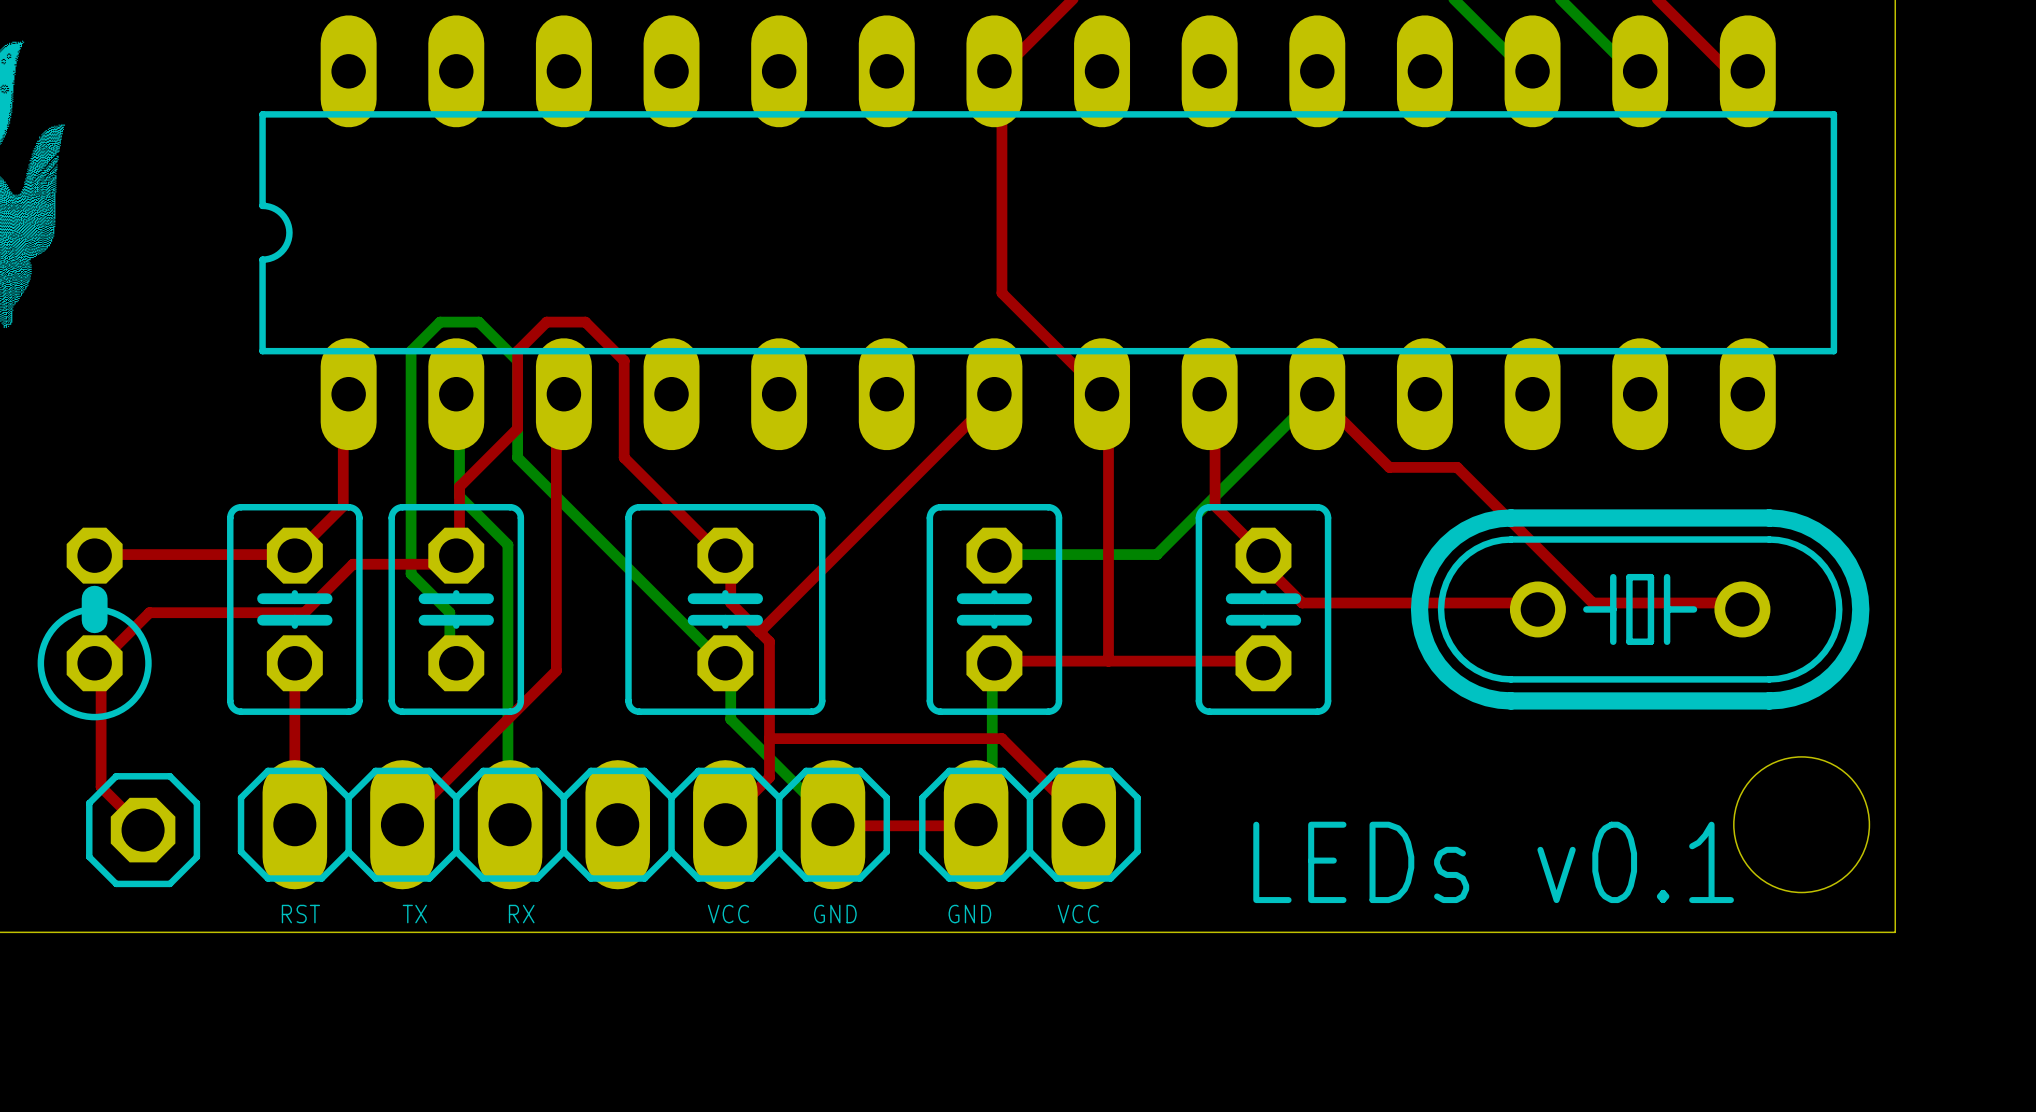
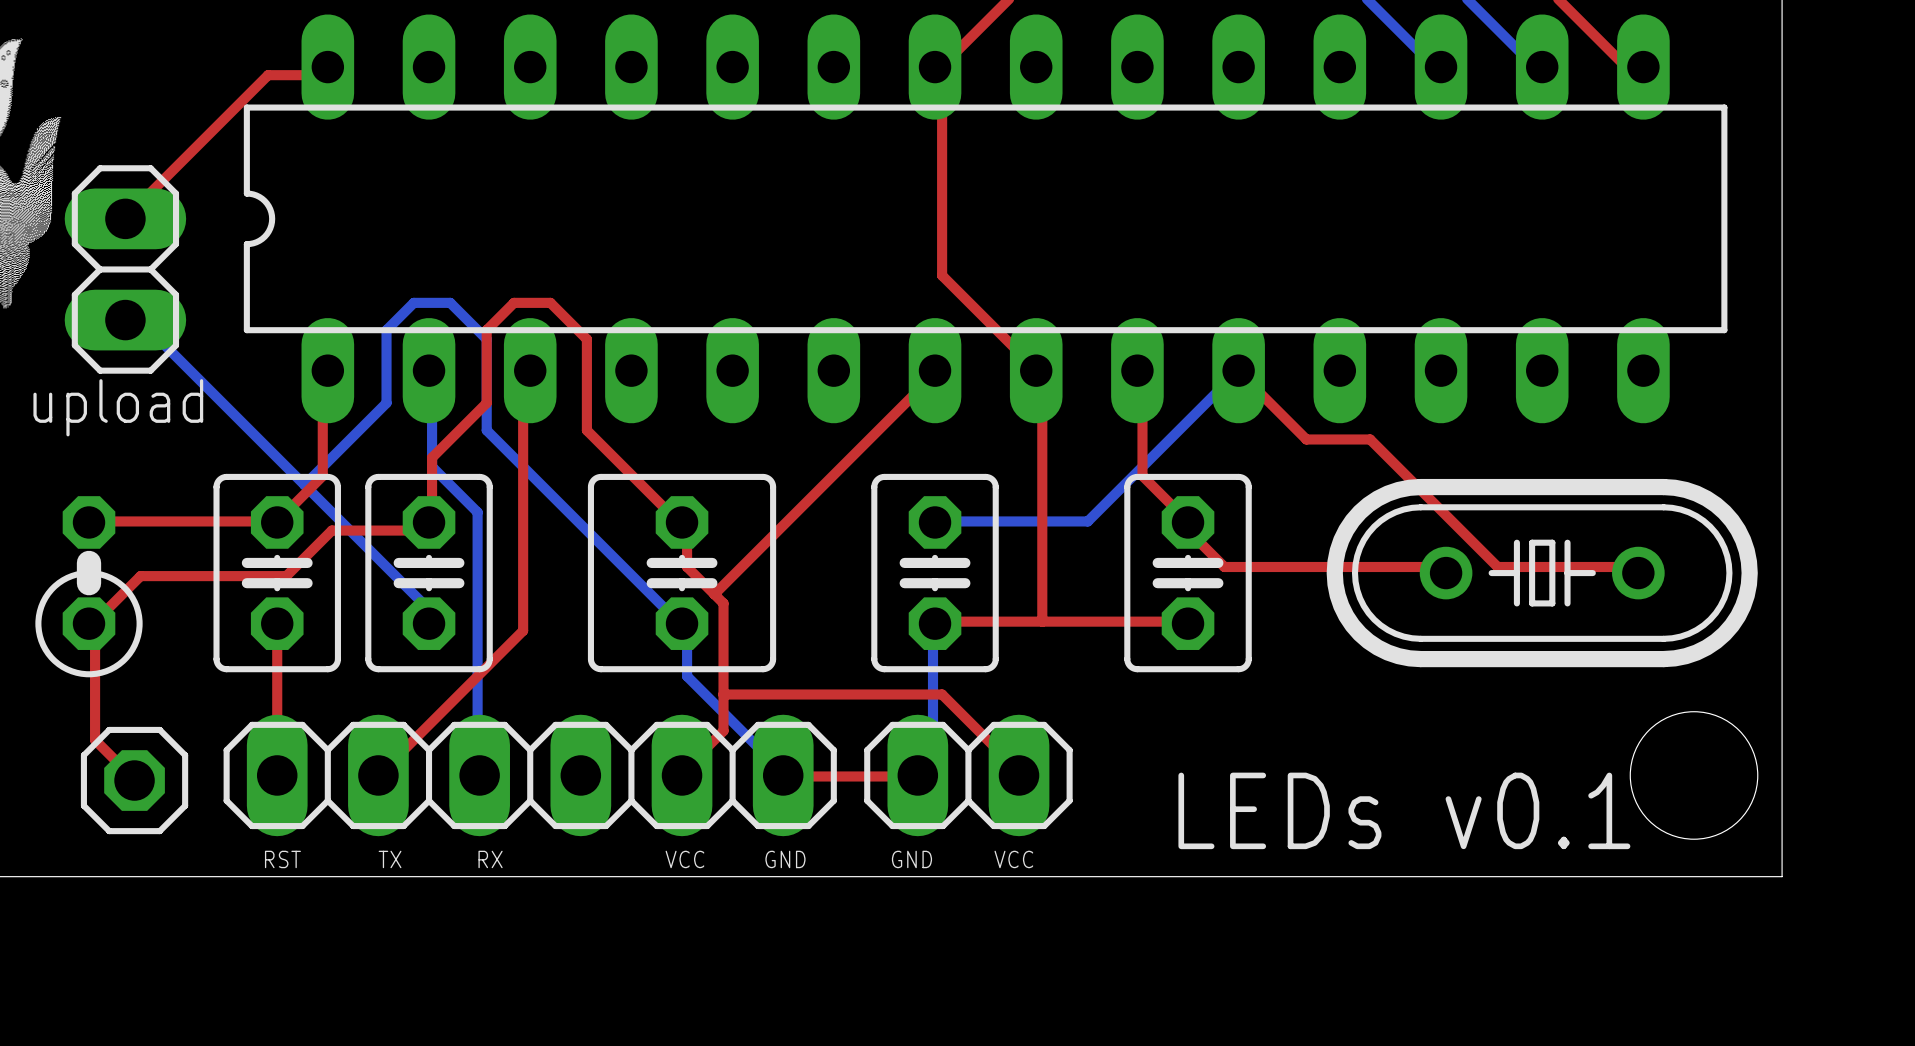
top track: none -> (327, 67) (322, 75) (268, 75) (125, 218)
part: none -> (125, 269)
bottom track: none -> (125, 320) (131, 311) (422, 603)
bottom track: (411, 428) (411, 573) (449, 612) (449, 641) -> (386, 403) (304, 485)
text: none -> upload (118, 407)

